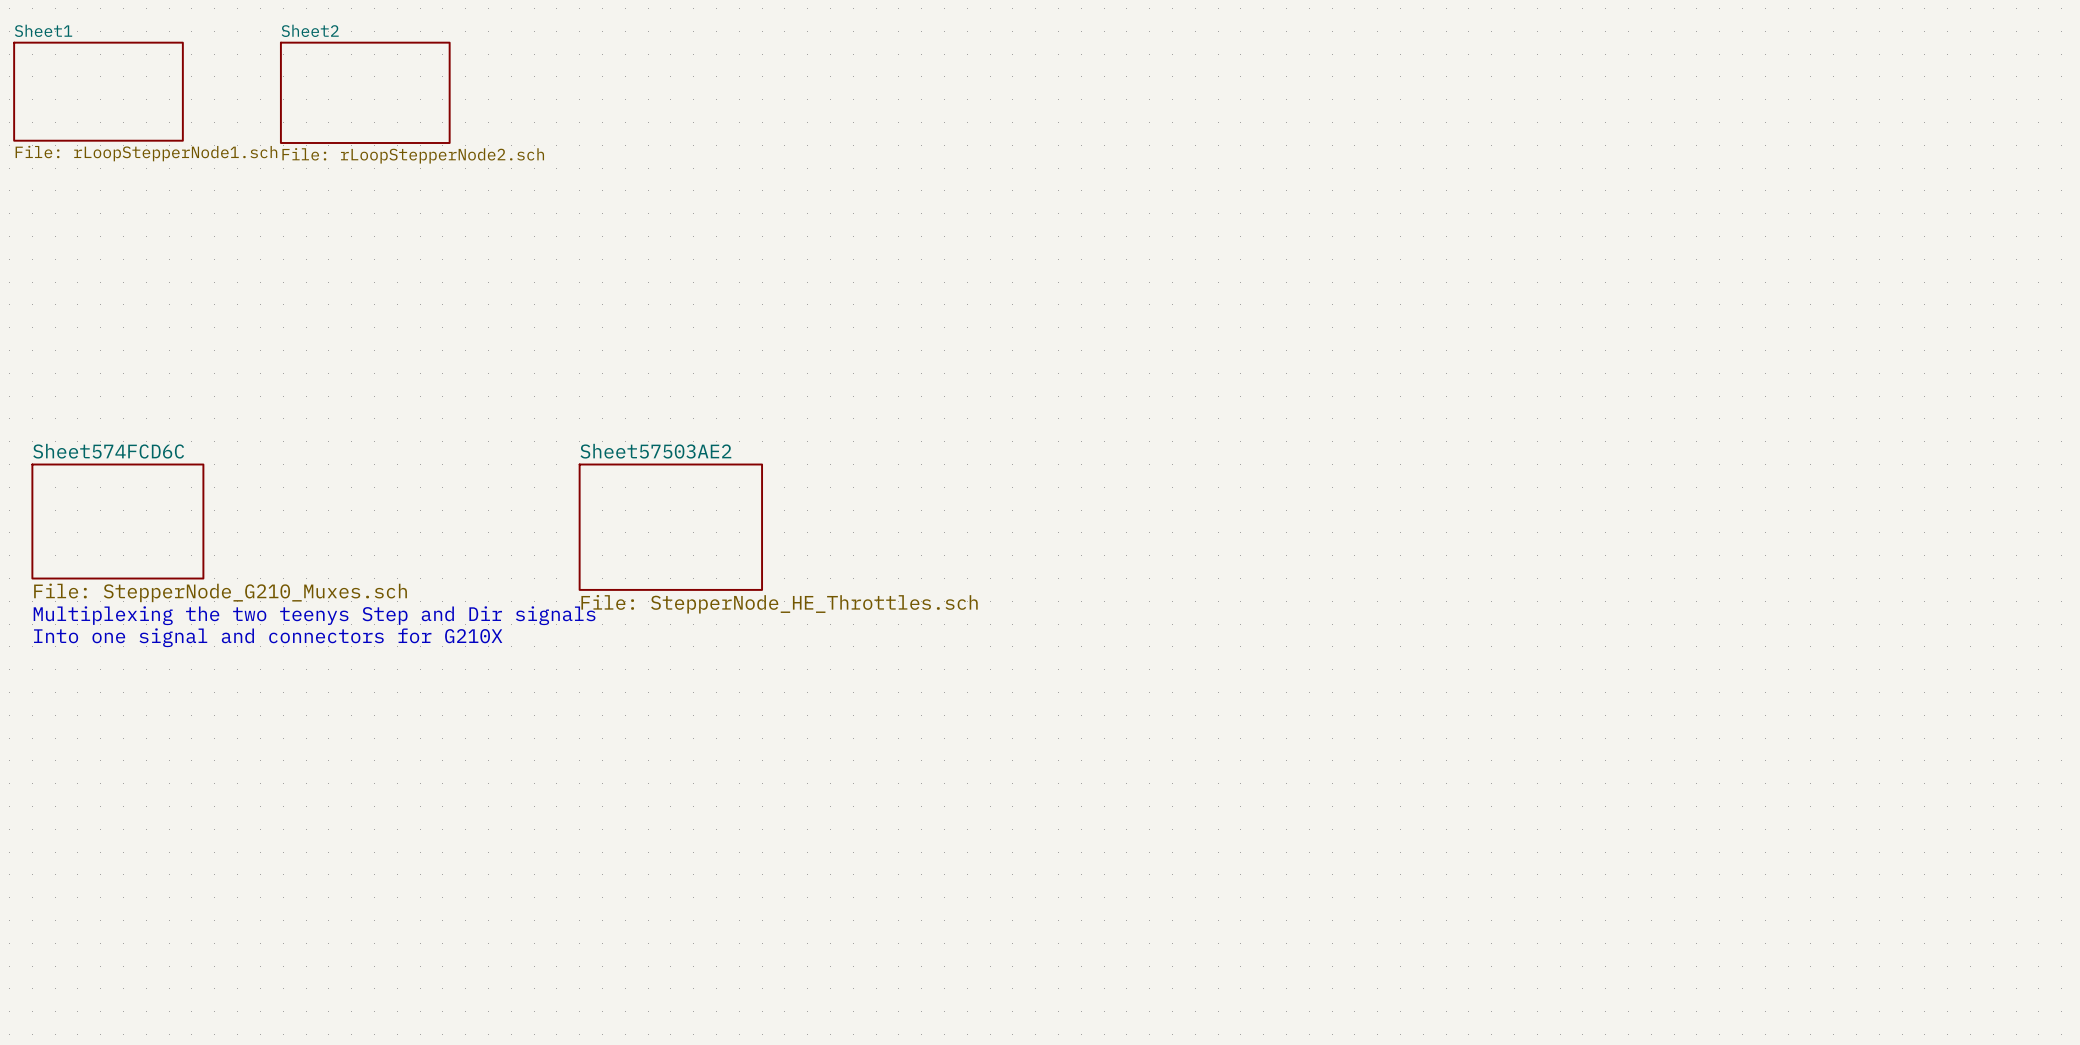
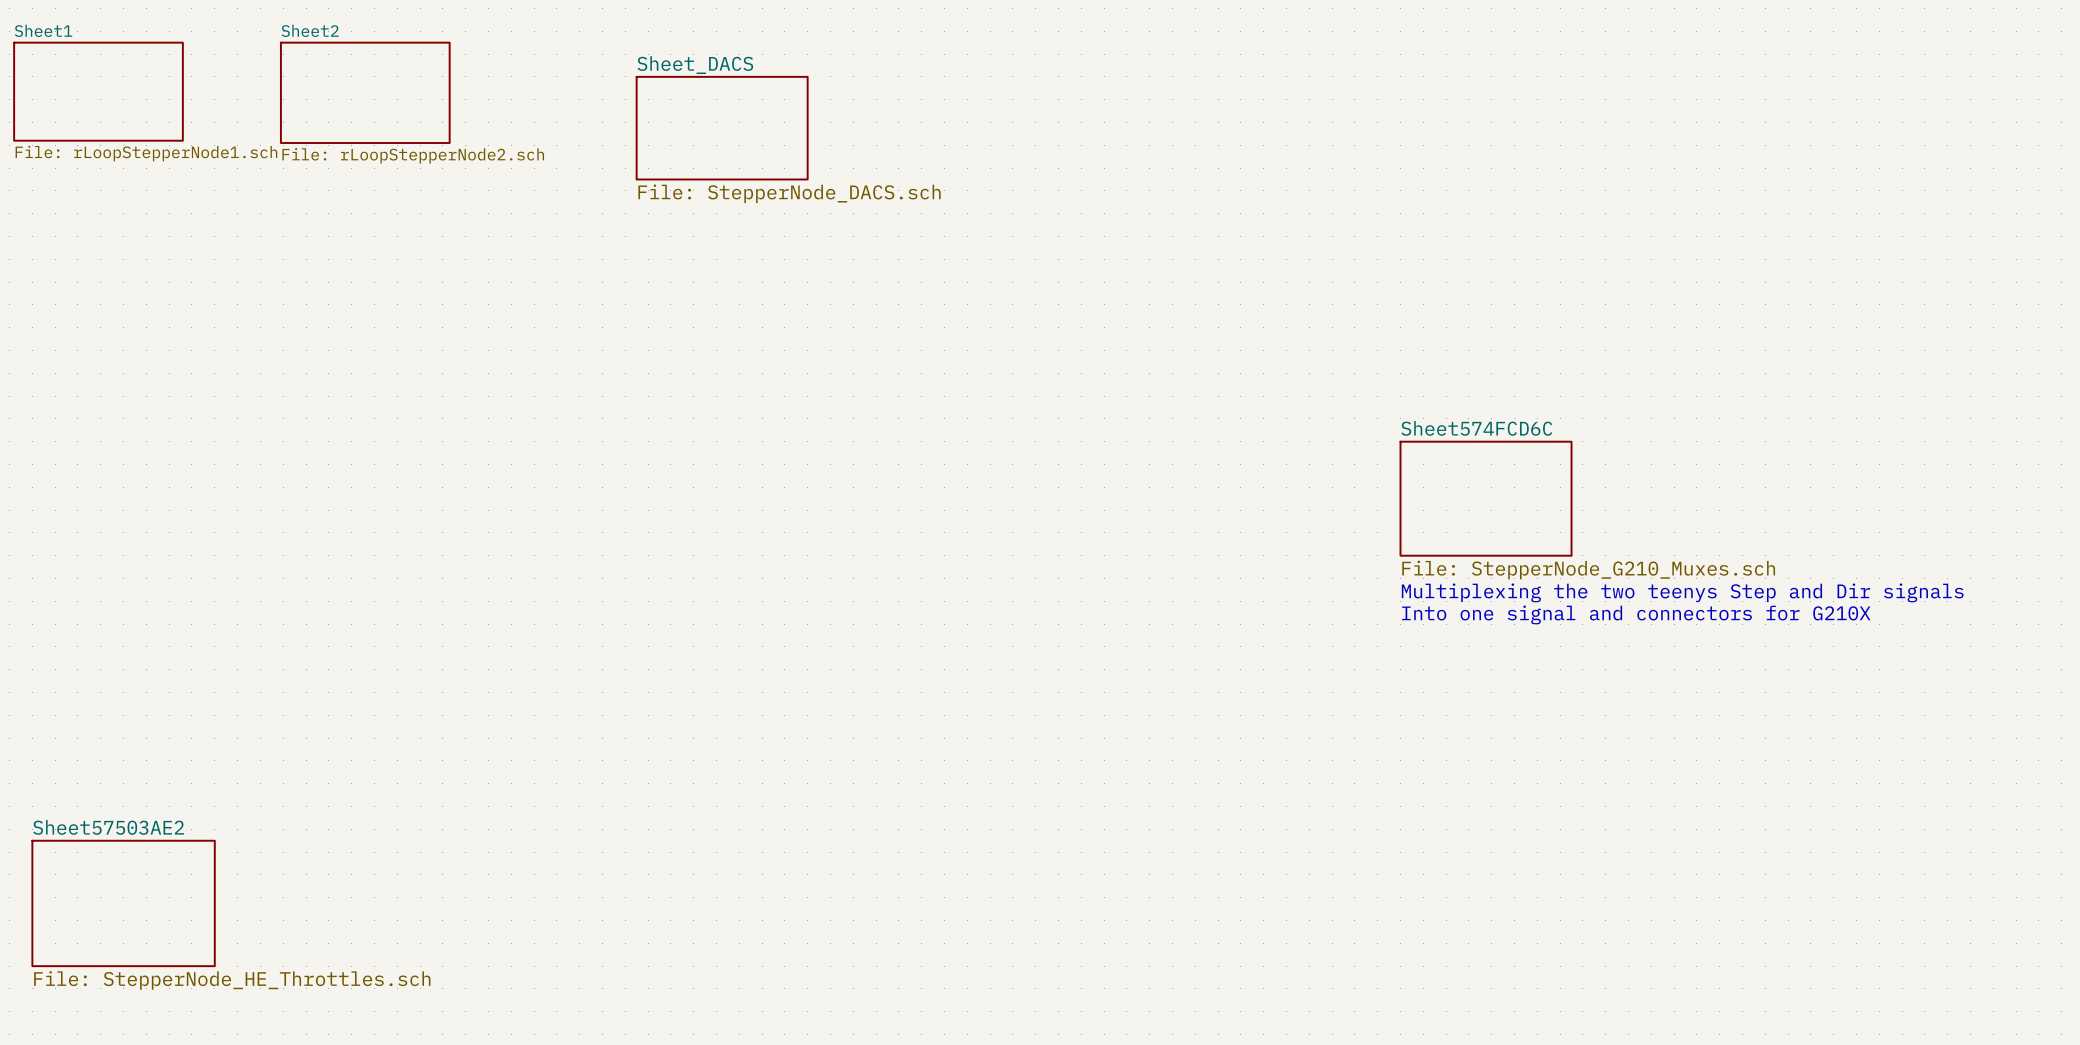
sheet Sheet_DACS: none -> File: StepperNode_DACS.sch (722, 128)
sheet Sheet574FCD6C position: (117, 521) -> (1486, 498)
sheet Sheet57503AE2 position: (670, 527) -> (123, 903)
text: none -> Multiplexing the two teenys Step and Dir signals (1682, 592)
text: none -> Into one signal and connectors for G210X (1636, 614)
text: Multiplexing the two teenys Step and Dir signals (314, 615) -> none
text: Into one signal and connectors for G210X (268, 637) -> none

